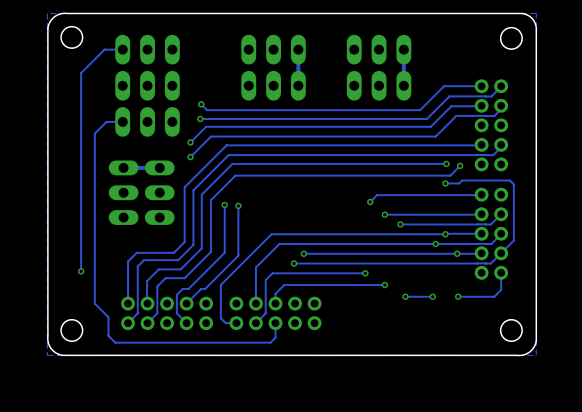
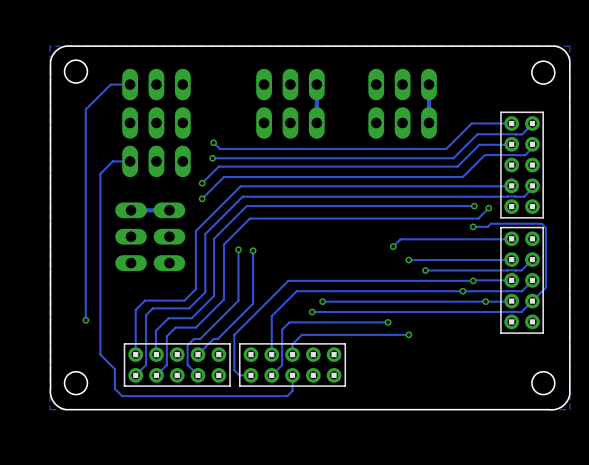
part side: top (491, 125) -> bottom (522, 165)
part side: top (491, 233) -> bottom (522, 280)
track: (501, 272) (501, 289) (494, 296) (458, 296) -> none
via: (405, 296) -> none
track: (432, 296) (405, 296) -> none
via: (432, 296) -> none
via: (458, 296) -> none
part side: top (167, 313) -> bottom (177, 364)
part side: top (275, 313) -> bottom (292, 364)

